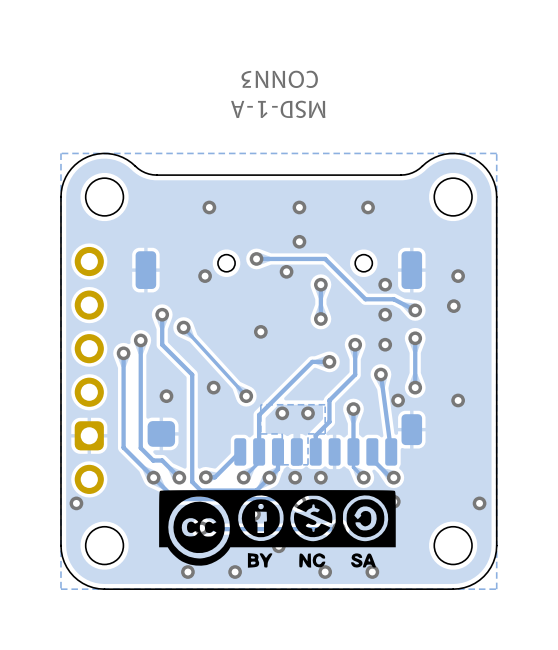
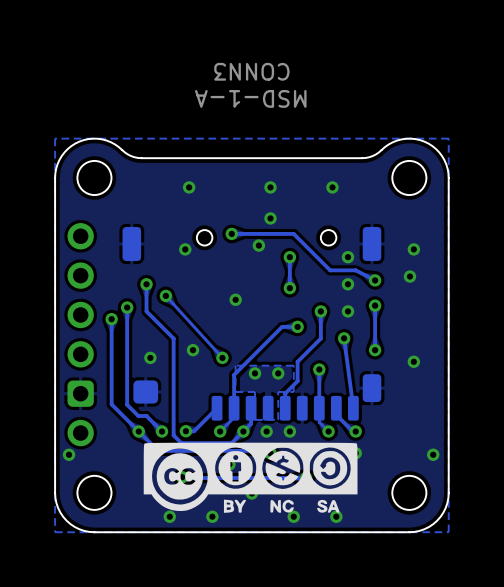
via: (398, 400) -> none

